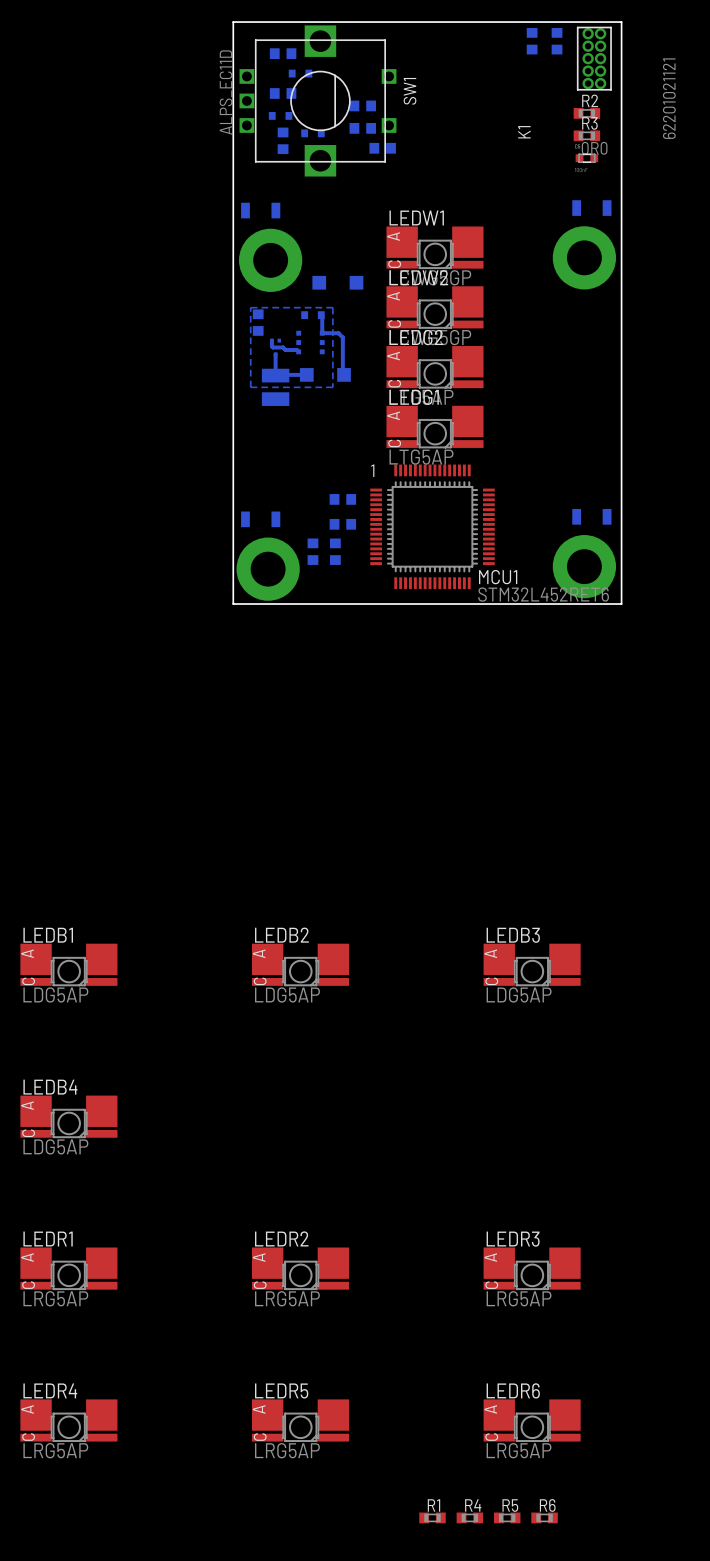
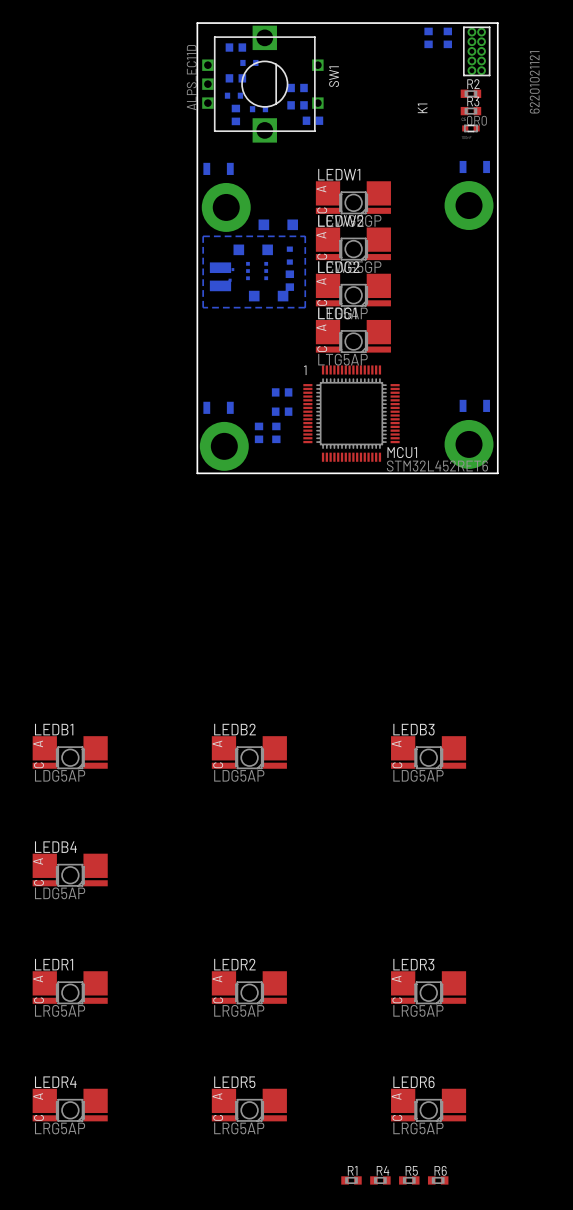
bottom zone outline: (250, 307) (250, 387) (332, 387) (332, 307) (250, 307) -> (203, 236) (203, 307) (305, 307) (305, 236) (203, 236)
part footprint: [301, 311, 325, 320] -> [233, 244, 273, 256]
bottom track: (321, 315) (322, 333) (338, 333) (342, 337) (344, 374) -> none
part position: (258, 322) -> (289, 280)
part: none -> (289, 255)
bottom track: (271, 340) (273, 347) (283, 347) (285, 350) (296, 350) (298, 351) -> none
bottom track: (275, 354) (275, 375) (306, 374) -> none
part position: (275, 387) -> (220, 276)

